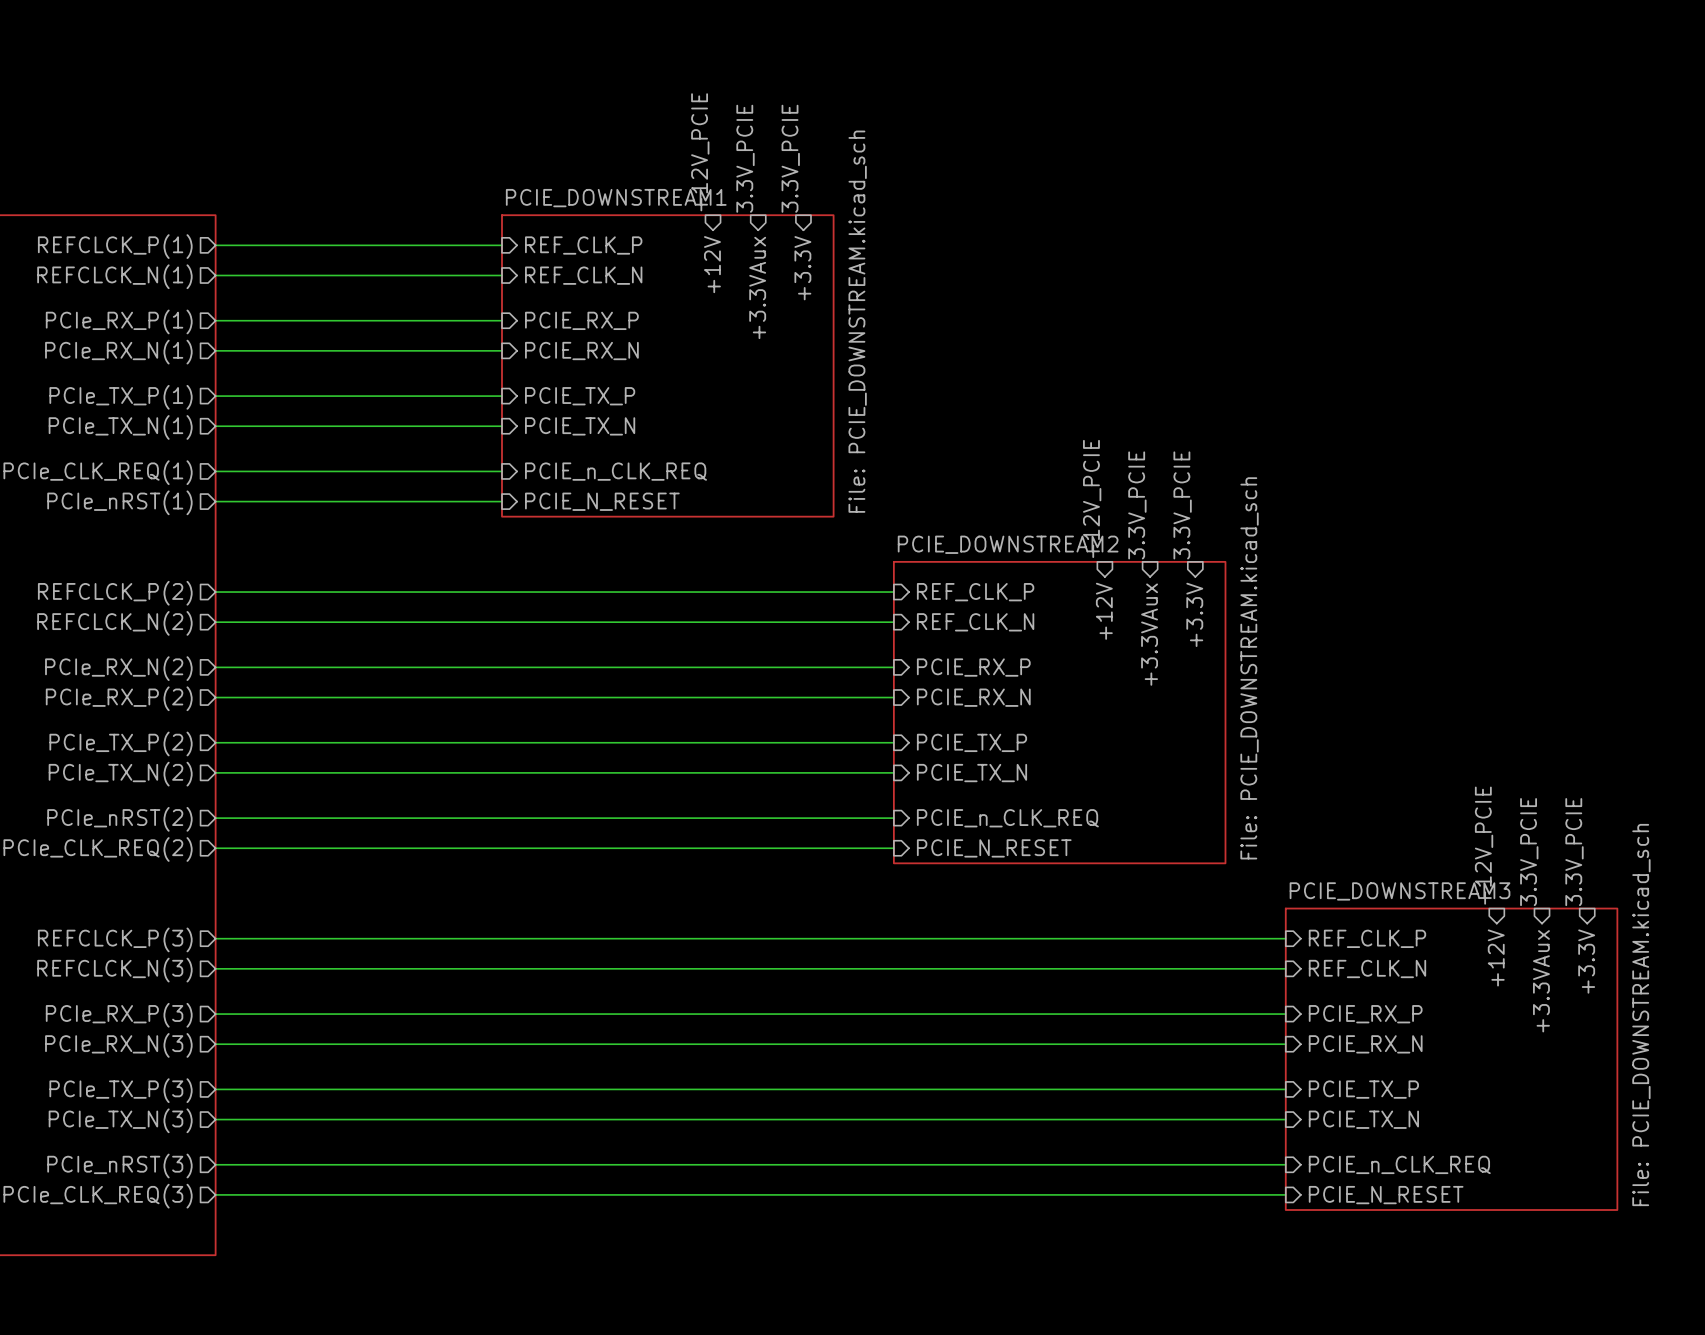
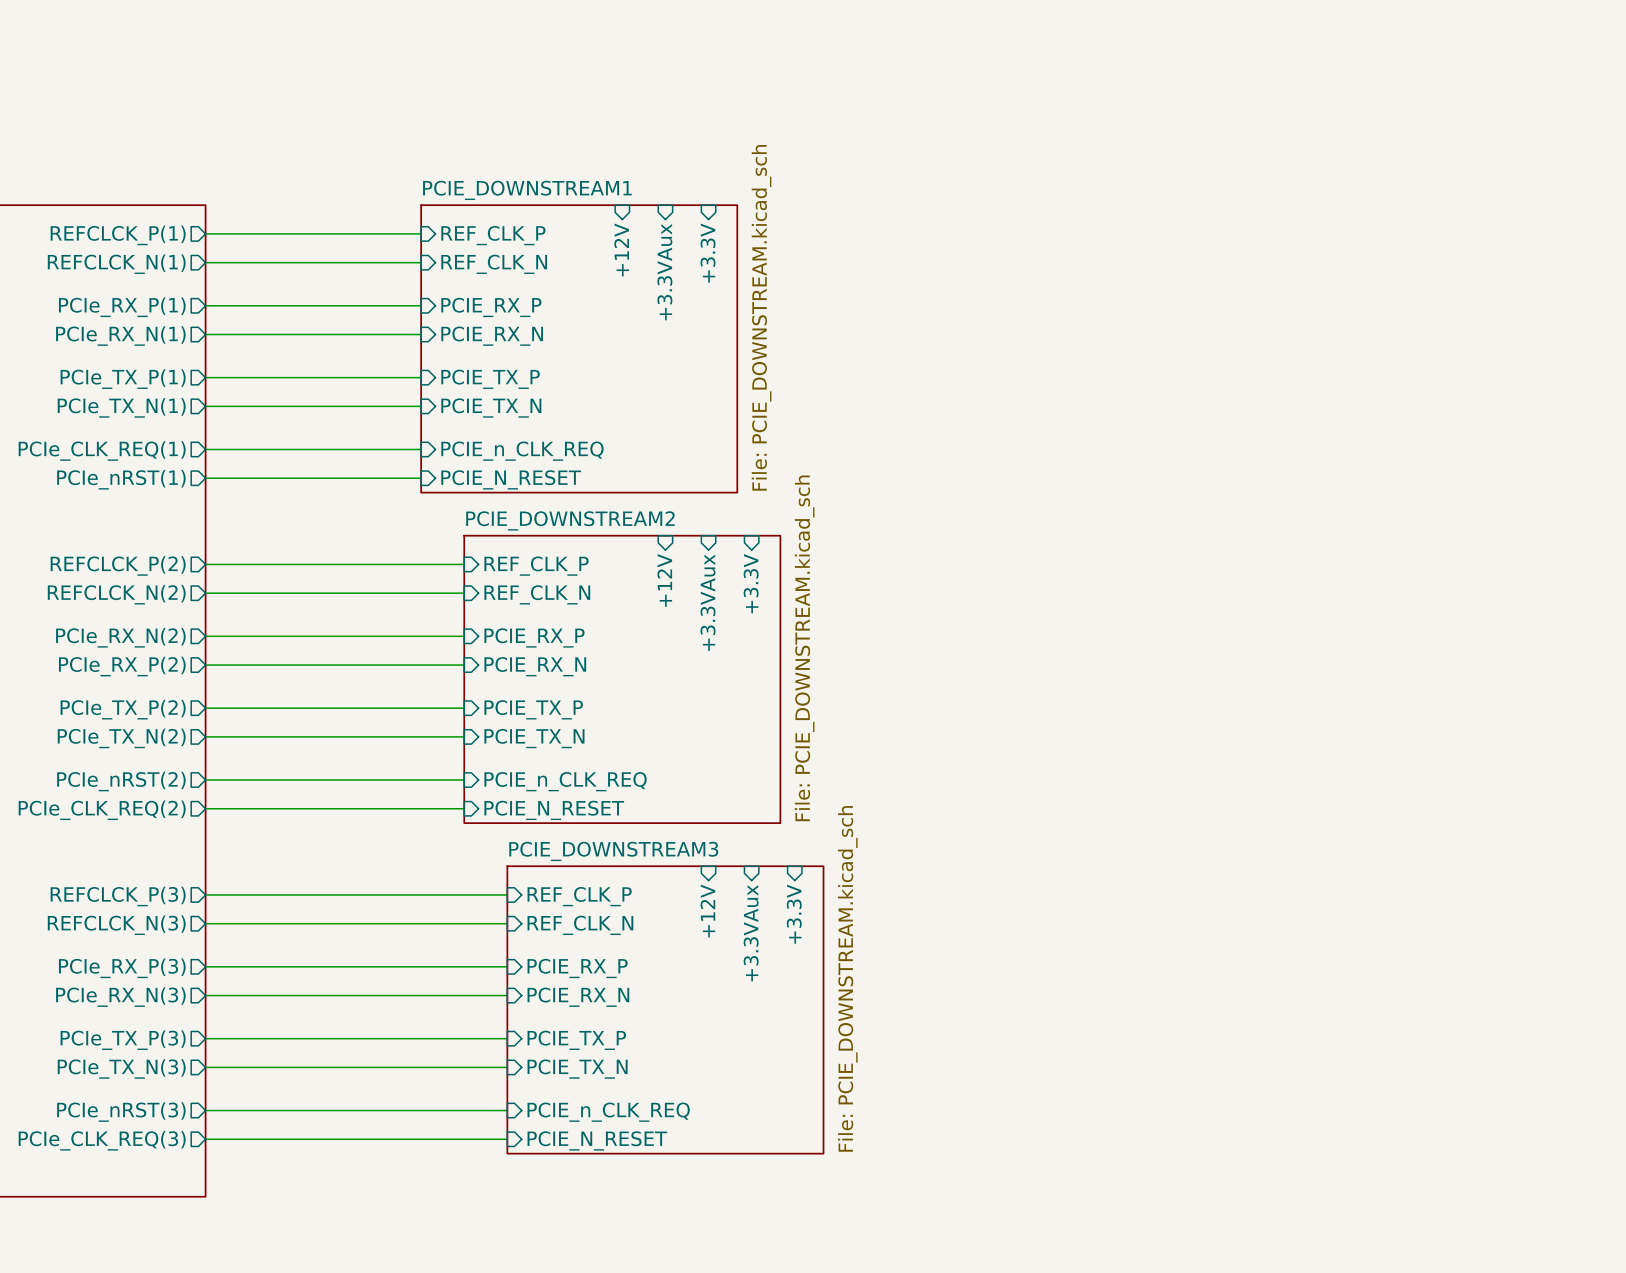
label: +12V_PCIE (700, 152) -> none
label: 3.3V_PCIE (745, 158) -> none
label: 3.3V_PCIE (790, 158) -> none
wire: (441, 245) (502, 245) -> none
sheet pin position: REF_CLK_P (583, 245) -> REF_CLK_P (493, 235)
sheet pin position: +12V (712, 264) -> +12V (621, 250)
sheet pin position: +3.3V (802, 268) -> +3.3V (708, 253)
wire: (441, 275) (502, 275) -> none
sheet pin position: REF_CLK_N (583, 275) -> REF_CLK_N (494, 264)
sheet pin position: +3.3VAux (757, 287) -> +3.3VAux (664, 272)
wire: (441, 320) (502, 320) -> none
sheet pin position: PCIE_RX_P (581, 320) -> PCIE_RX_P (491, 307)
wire: (441, 350) (502, 350) -> none
sheet pin position: PCIE_RX_N (581, 351) -> PCIE_RX_N (492, 336)
sheet PCIE_DOWNSTREAM1 position: (667, 365) -> (579, 348)
wire: (441, 396) (502, 396) -> none
sheet pin position: PCIE_TX_P (580, 396) -> PCIE_TX_P (490, 379)
wire: (441, 426) (502, 426) -> none
sheet pin position: PCIE_TX_N (580, 426) -> PCIE_TX_N (491, 408)
wire: (441, 471) (502, 471) -> none
sheet pin position: PCIE_n_CLK_REQ (615, 471) -> PCIE_n_CLK_REQ (522, 451)
label: +12V_PCIE (1092, 498) -> none
wire: (441, 501) (502, 501) -> none
sheet pin position: PCIE_N_RESET (602, 501) -> PCIE_N_RESET (511, 479)
label: 3.3V_PCIE (1137, 505) -> none
label: 3.3V_PCIE (1182, 505) -> none
wire: (486, 592) (893, 592) -> none
sheet pin: none -> REF_CLK_P (536, 566)
sheet pin: REF_CLK_P (975, 592) -> none
sheet pin: none -> +12V (664, 580)
sheet pin: +12V (1104, 611) -> none
sheet pin: none -> +3.3V (751, 583)
sheet pin: +3.3V (1194, 614) -> none
wire: (486, 622) (893, 622) -> none
sheet pin: none -> REF_CLK_N (537, 594)
sheet pin: REF_CLK_N (975, 622) -> none
sheet pin: none -> +3.3VAux (708, 602)
sheet pin: +3.3VAux (1149, 634) -> none
wire: (486, 667) (893, 667) -> none
sheet pin: none -> PCIE_RX_P (534, 637)
sheet pin: PCIE_RX_P (973, 667) -> none
wire: (486, 697) (893, 697) -> none
sheet pin: none -> PCIE_RX_N (535, 666)
sheet pin: PCIE_RX_N (973, 697) -> none
sheet PCIE_DOWNSTREAM2 position: (1059, 712) -> (622, 679)
wire: (486, 742) (893, 742) -> none
sheet pin: none -> PCIE_TX_P (533, 709)
sheet pin: PCIE_TX_P (971, 742) -> none
wire: (486, 772) (893, 772) -> none
sheet pin: none -> PCIE_TX_N (534, 738)
sheet pin: PCIE_TX_N (971, 773) -> none
wire: (486, 818) (893, 818) -> none
sheet pin: none -> PCIE_n_CLK_REQ (565, 781)
sheet pin: PCIE_n_CLK_REQ (1007, 818) -> none
label: +12V_PCIE (1484, 845) -> none
wire: (486, 848) (893, 848) -> none
sheet pin: none -> PCIE_N_RESET (554, 810)
sheet pin: PCIE_N_RESET (994, 848) -> none
label: 3.3V_PCIE (1529, 852) -> none
label: 3.3V_PCIE (1574, 852) -> none
wire: (532, 938) (1285, 938) -> none
sheet pin: none -> REF_CLK_P (579, 896)
sheet pin: REF_CLK_P (1367, 938) -> none
sheet pin: none -> +12V (707, 911)
sheet pin: +12V (1496, 957) -> none
sheet pin: none -> +3.3V (794, 914)
sheet pin: +3.3V (1586, 961) -> none
wire: (532, 968) (1285, 968) -> none
sheet pin: none -> REF_CLK_N (580, 925)
sheet pin: REF_CLK_N (1367, 968) -> none
sheet pin: none -> +3.3VAux (751, 933)
sheet pin: +3.3VAux (1541, 981) -> none
wire: (532, 1014) (1285, 1014) -> none
sheet pin: none -> PCIE_RX_P (577, 968)
sheet pin: PCIE_RX_P (1365, 1014) -> none
wire: (532, 1044) (1285, 1044) -> none
sheet pin: none -> PCIE_RX_N (578, 997)
sheet pin: PCIE_RX_N (1365, 1044) -> none
sheet PCIE_DOWNSTREAM3 position: (1451, 1059) -> (665, 1009)
wire: (532, 1089) (1285, 1089) -> none
sheet pin: none -> PCIE_TX_P (576, 1040)
sheet pin: PCIE_TX_P (1363, 1089) -> none
wire: (532, 1119) (1285, 1119) -> none
sheet pin: none -> PCIE_TX_N (577, 1069)
sheet pin: PCIE_TX_N (1363, 1119) -> none
wire: (532, 1164) (1285, 1164) -> none
sheet pin: none -> PCIE_n_CLK_REQ (608, 1112)
sheet pin: PCIE_n_CLK_REQ (1399, 1164) -> none
wire: (532, 1194) (1285, 1194) -> none
sheet pin: none -> PCIE_N_RESET (597, 1140)
sheet pin: PCIE_N_RESET (1386, 1195) -> none

